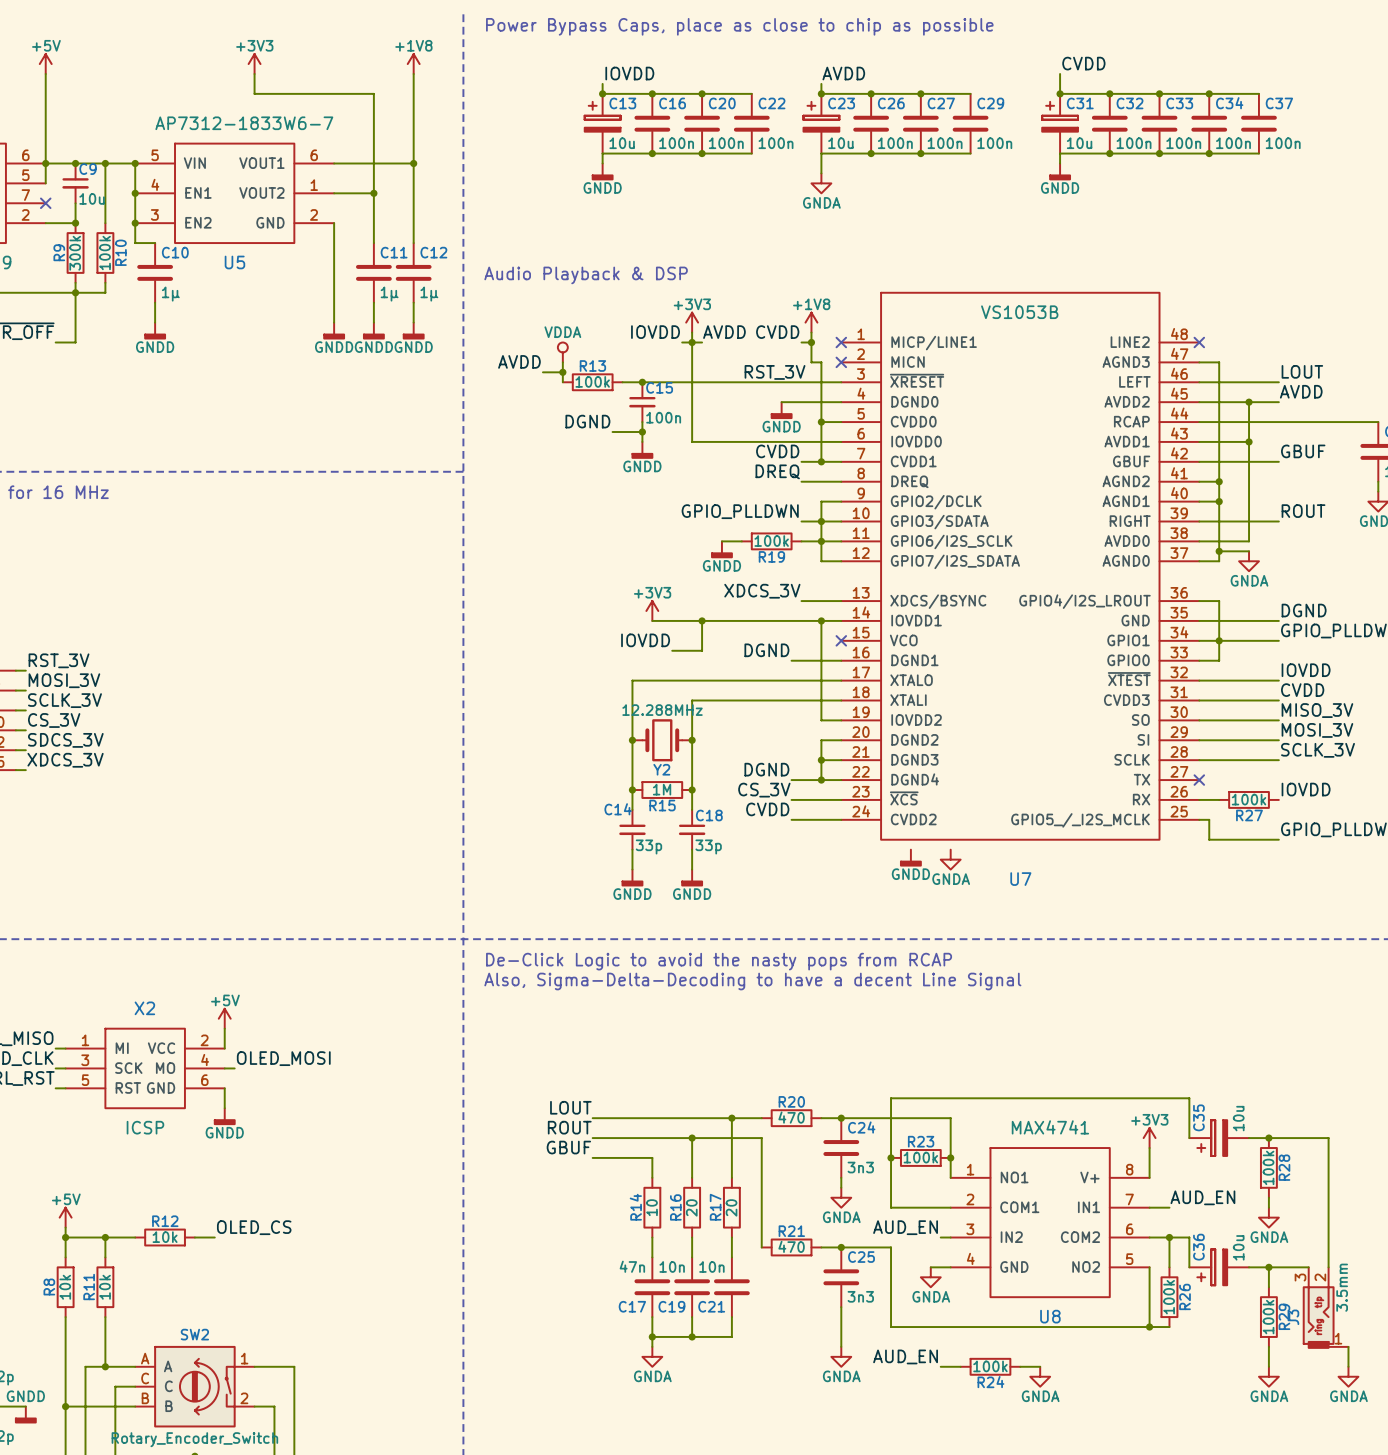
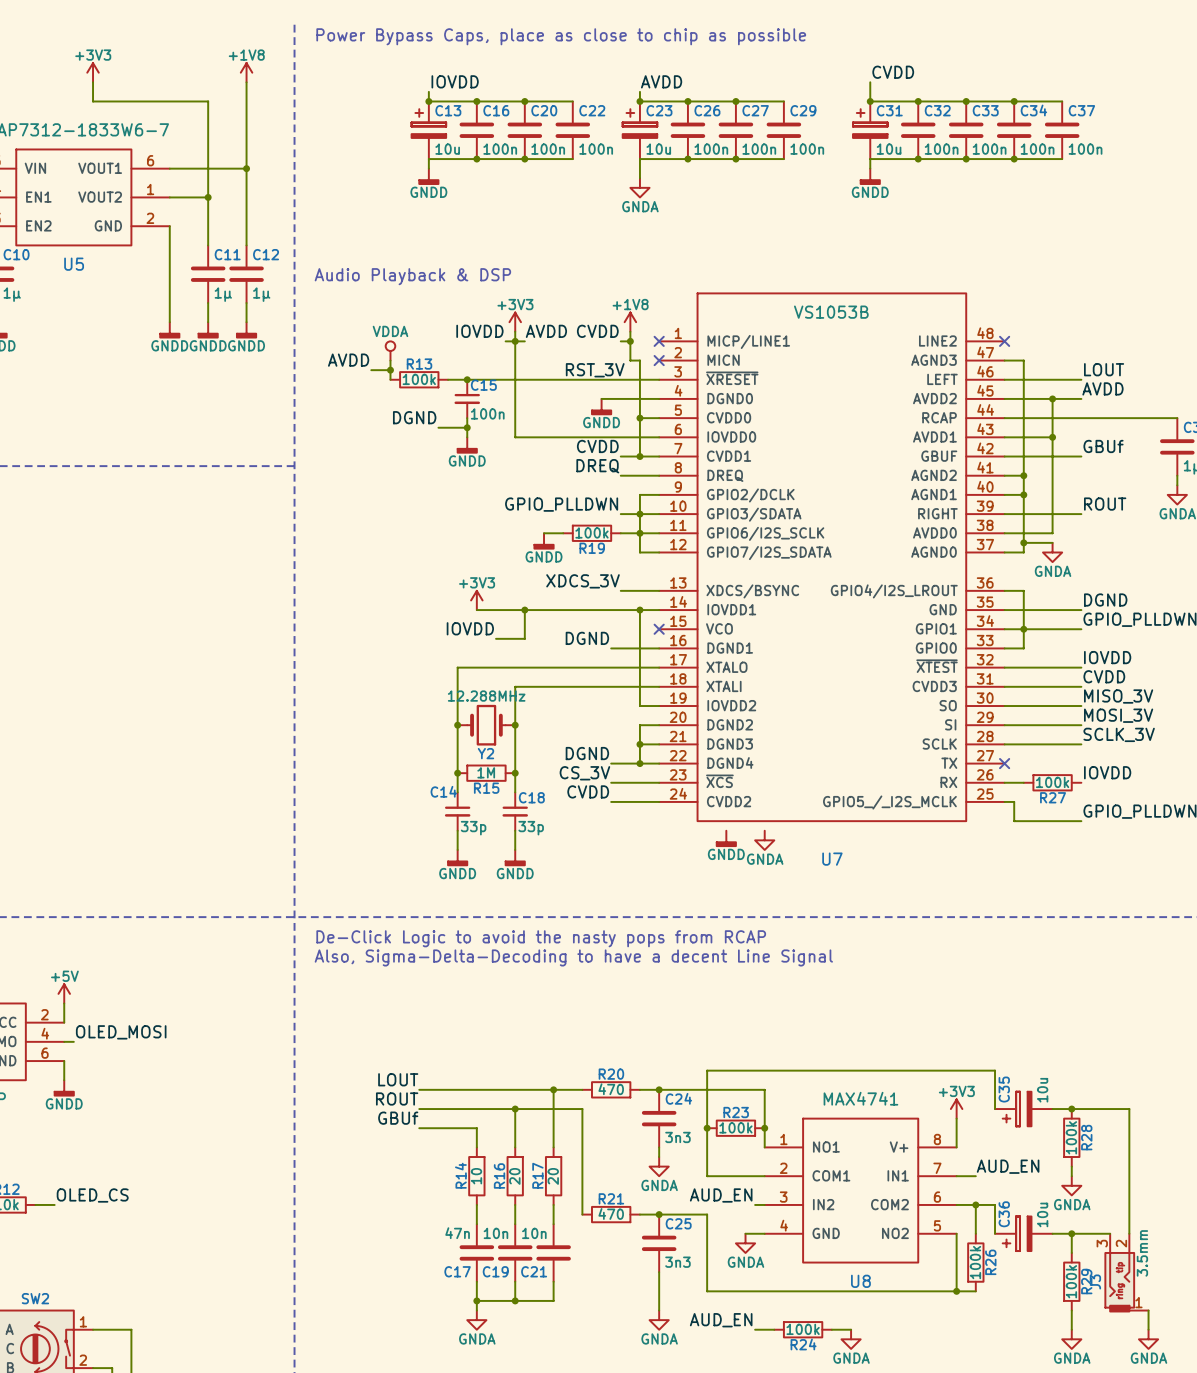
label: GBUF (1303, 451) -> GBUf (1103, 446)
label: GBUF (568, 1147) -> GBUf (398, 1118)

